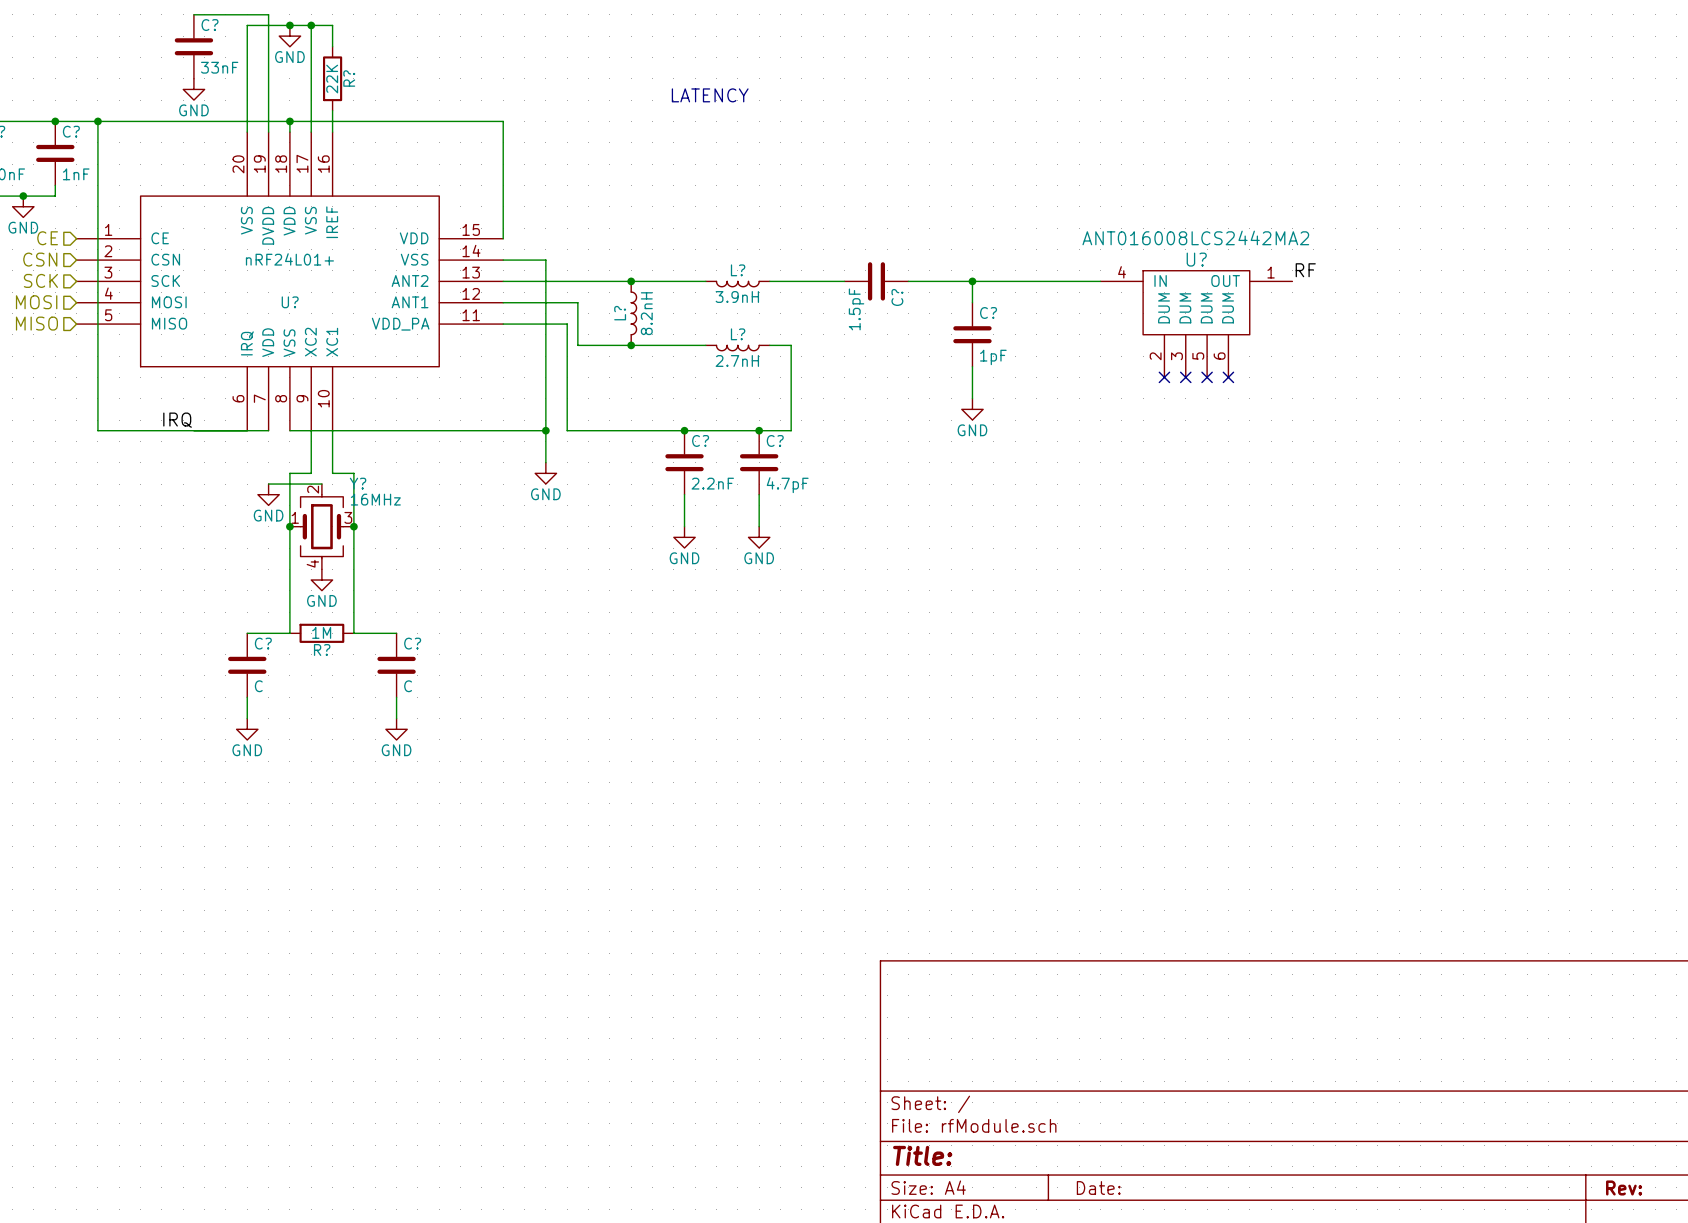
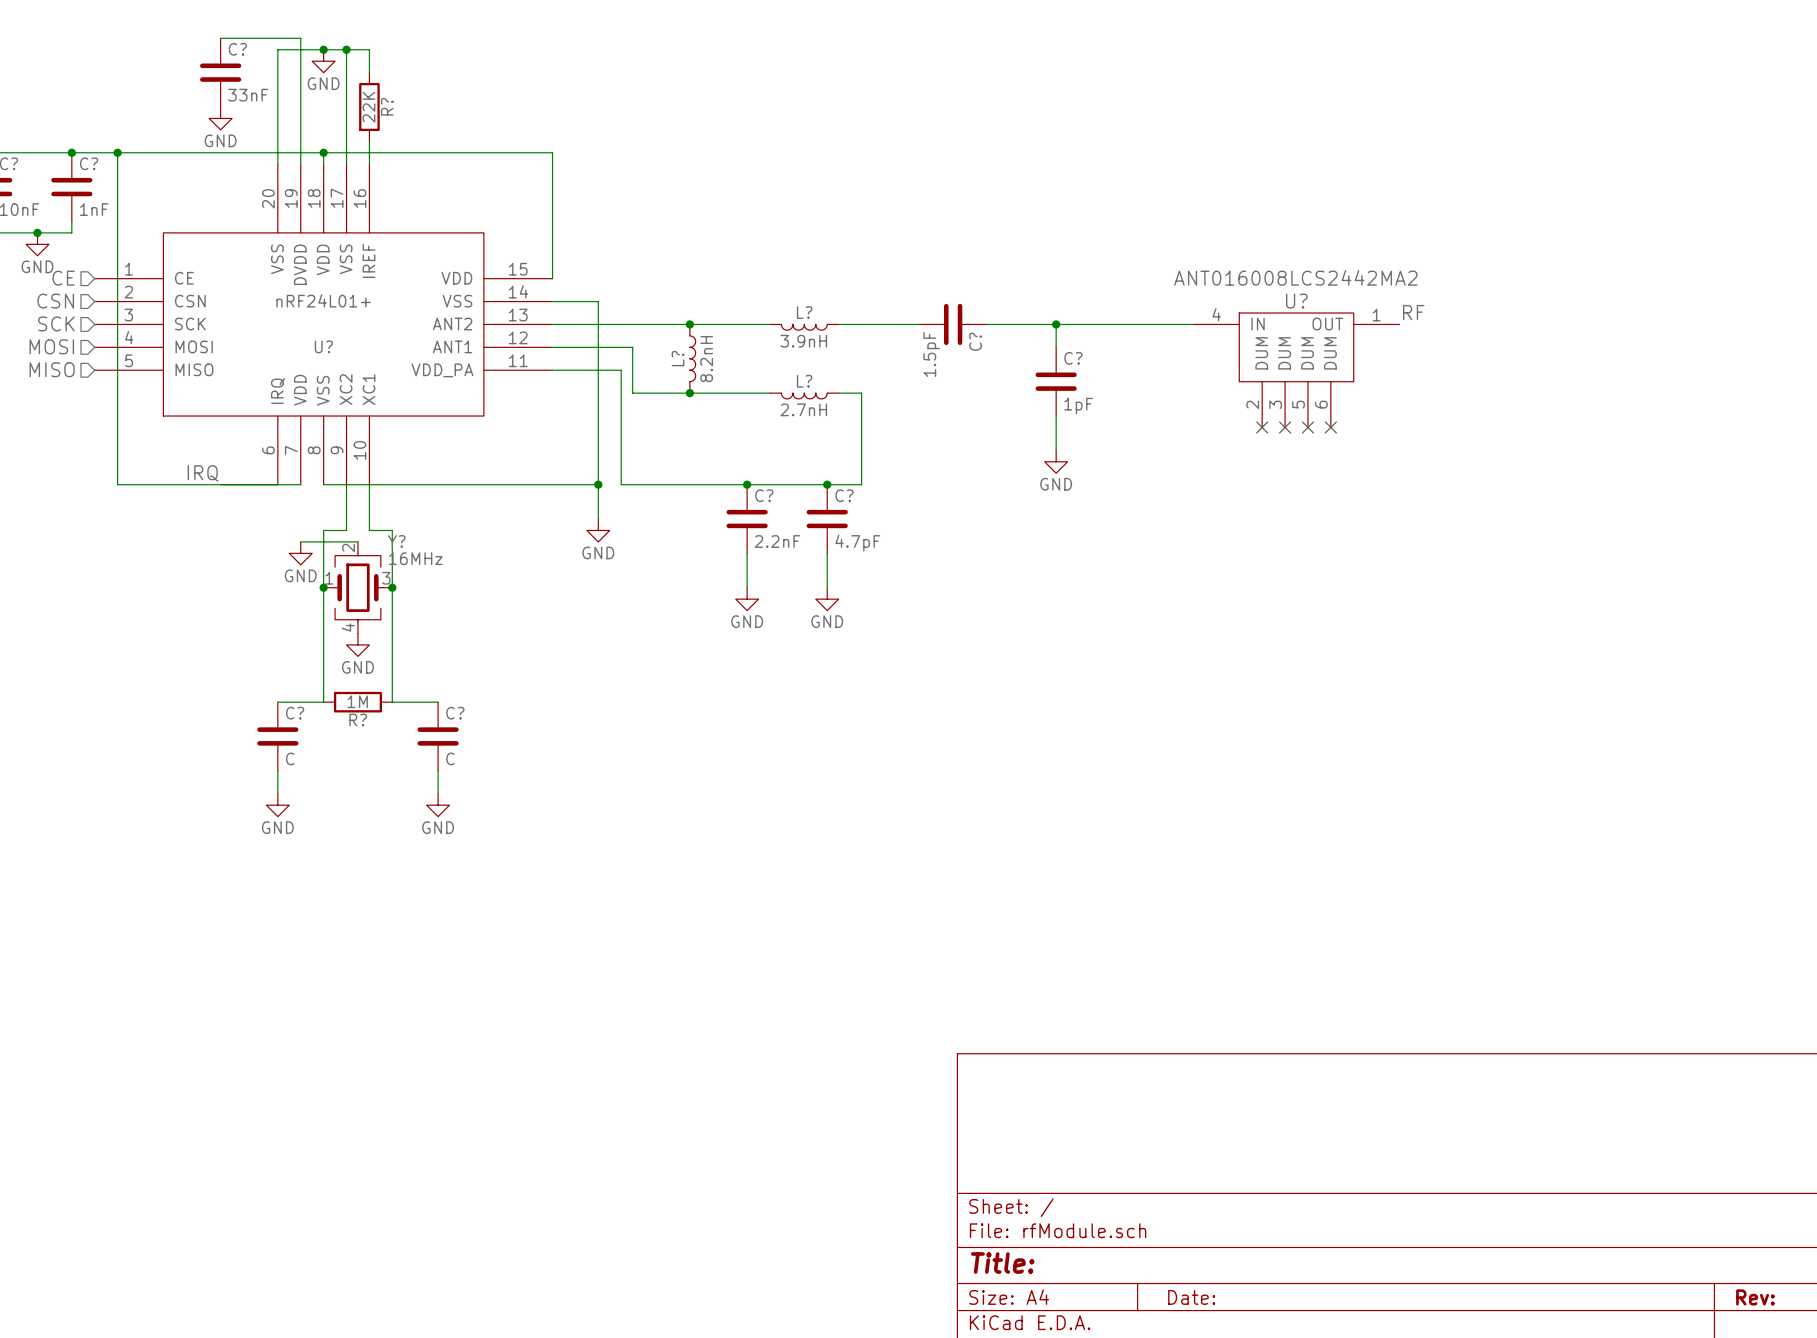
text: LATENCY (710, 95) -> none

